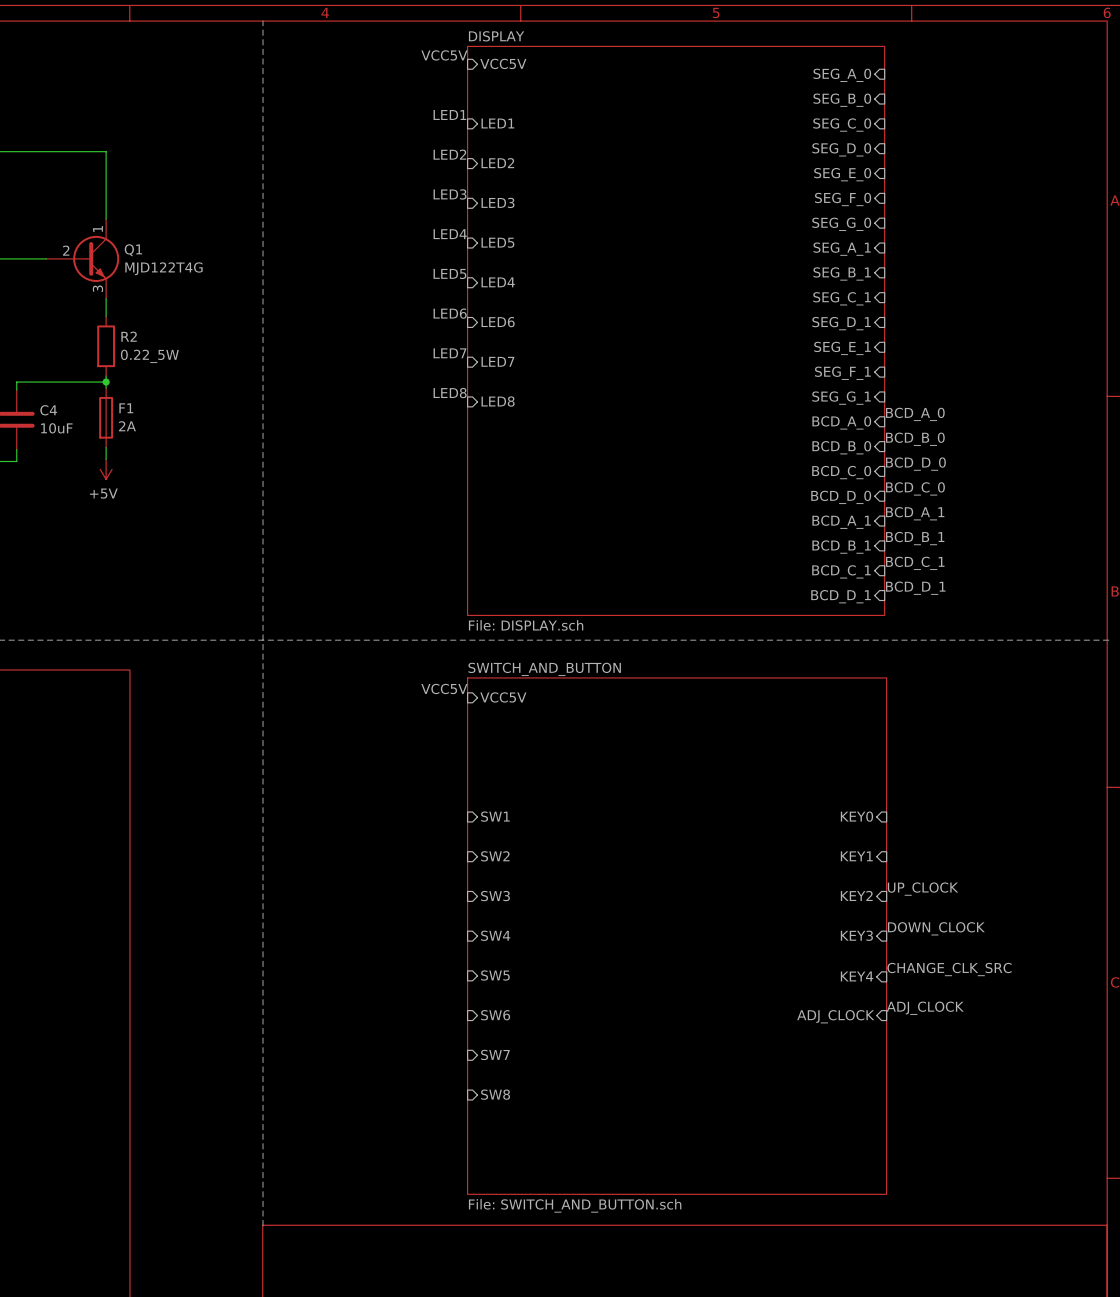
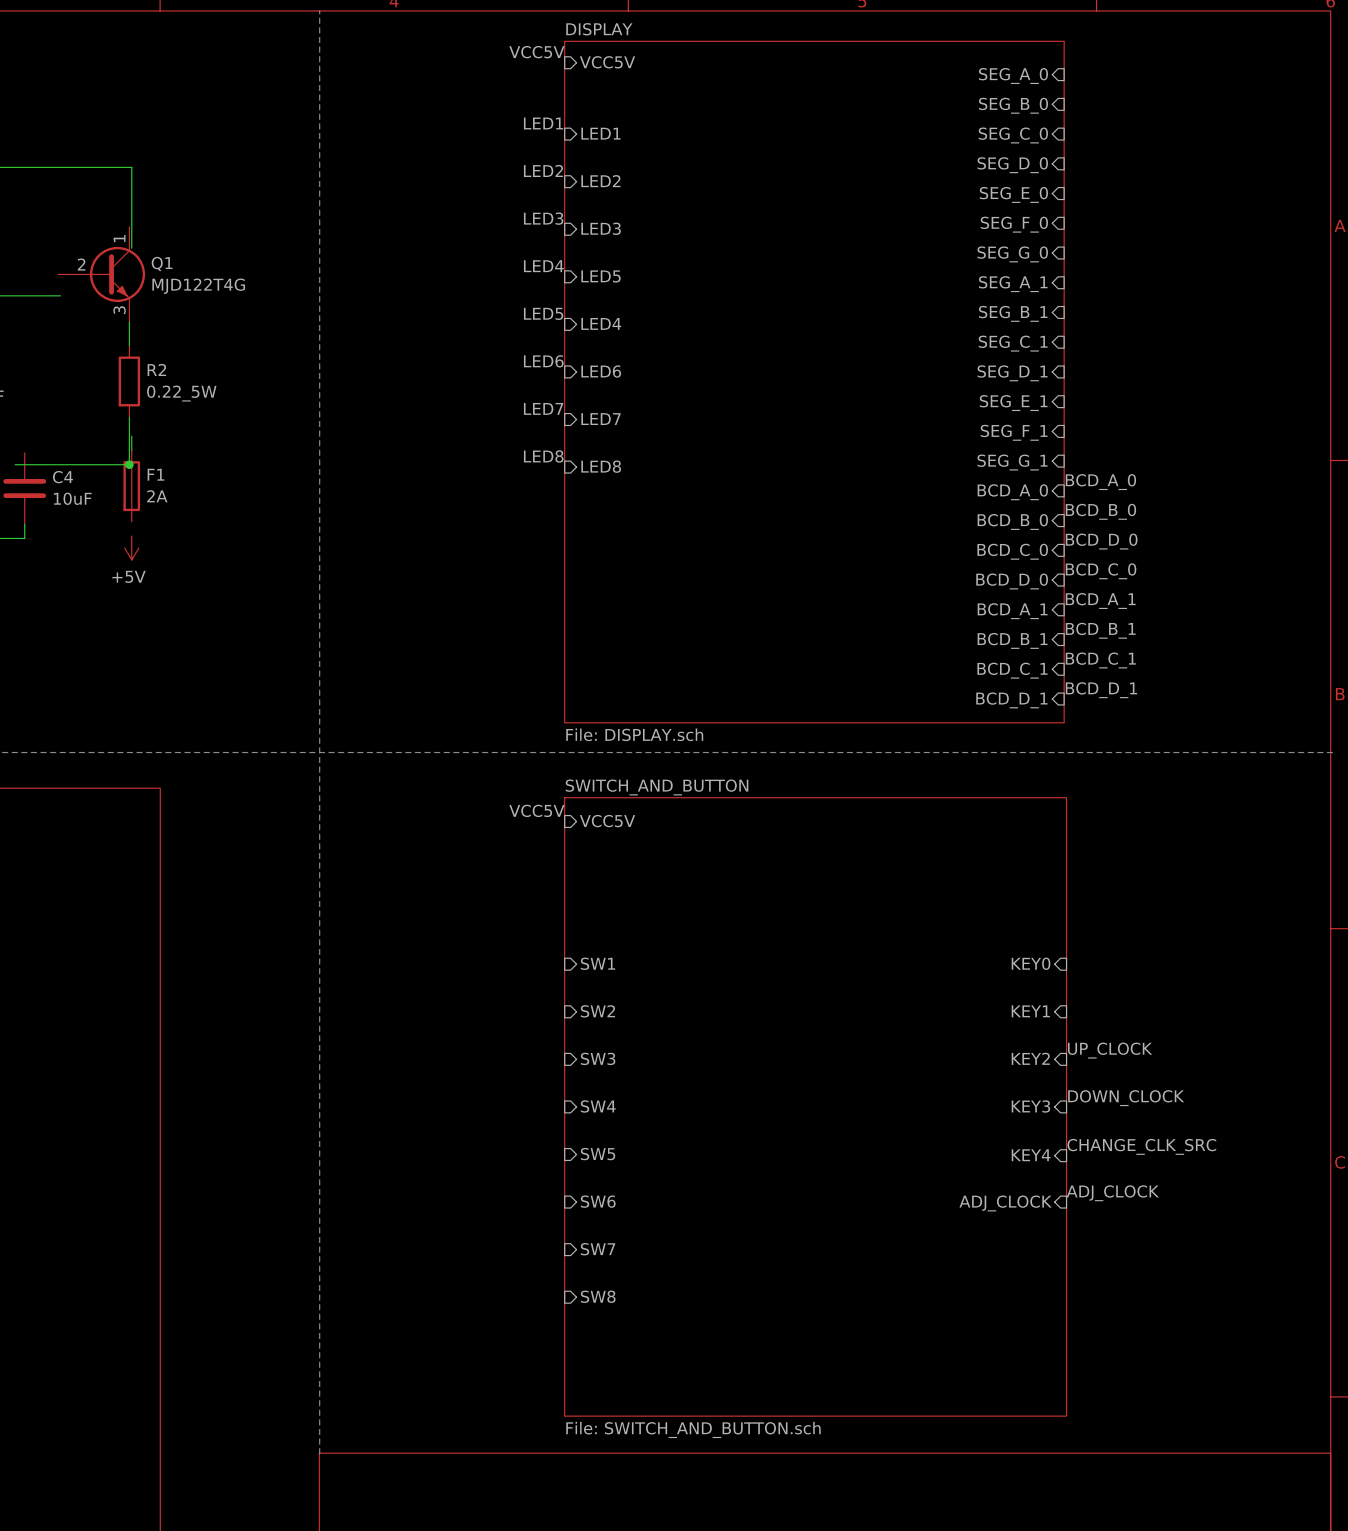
Q1 position: (82, 258) -> (101, 274)
wire: none -> (129, 322) (129, 345)
wire: (106, 298) (106, 316) -> none
R2 position: (106, 346) -> (129, 381)
wire: none -> (129, 417) (129, 464) (15, 464)
wire: (106, 382) (16, 382) (16, 389) -> none
junction position: (106, 382) -> (129, 464)
wire: (106, 447) (106, 459) -> none

